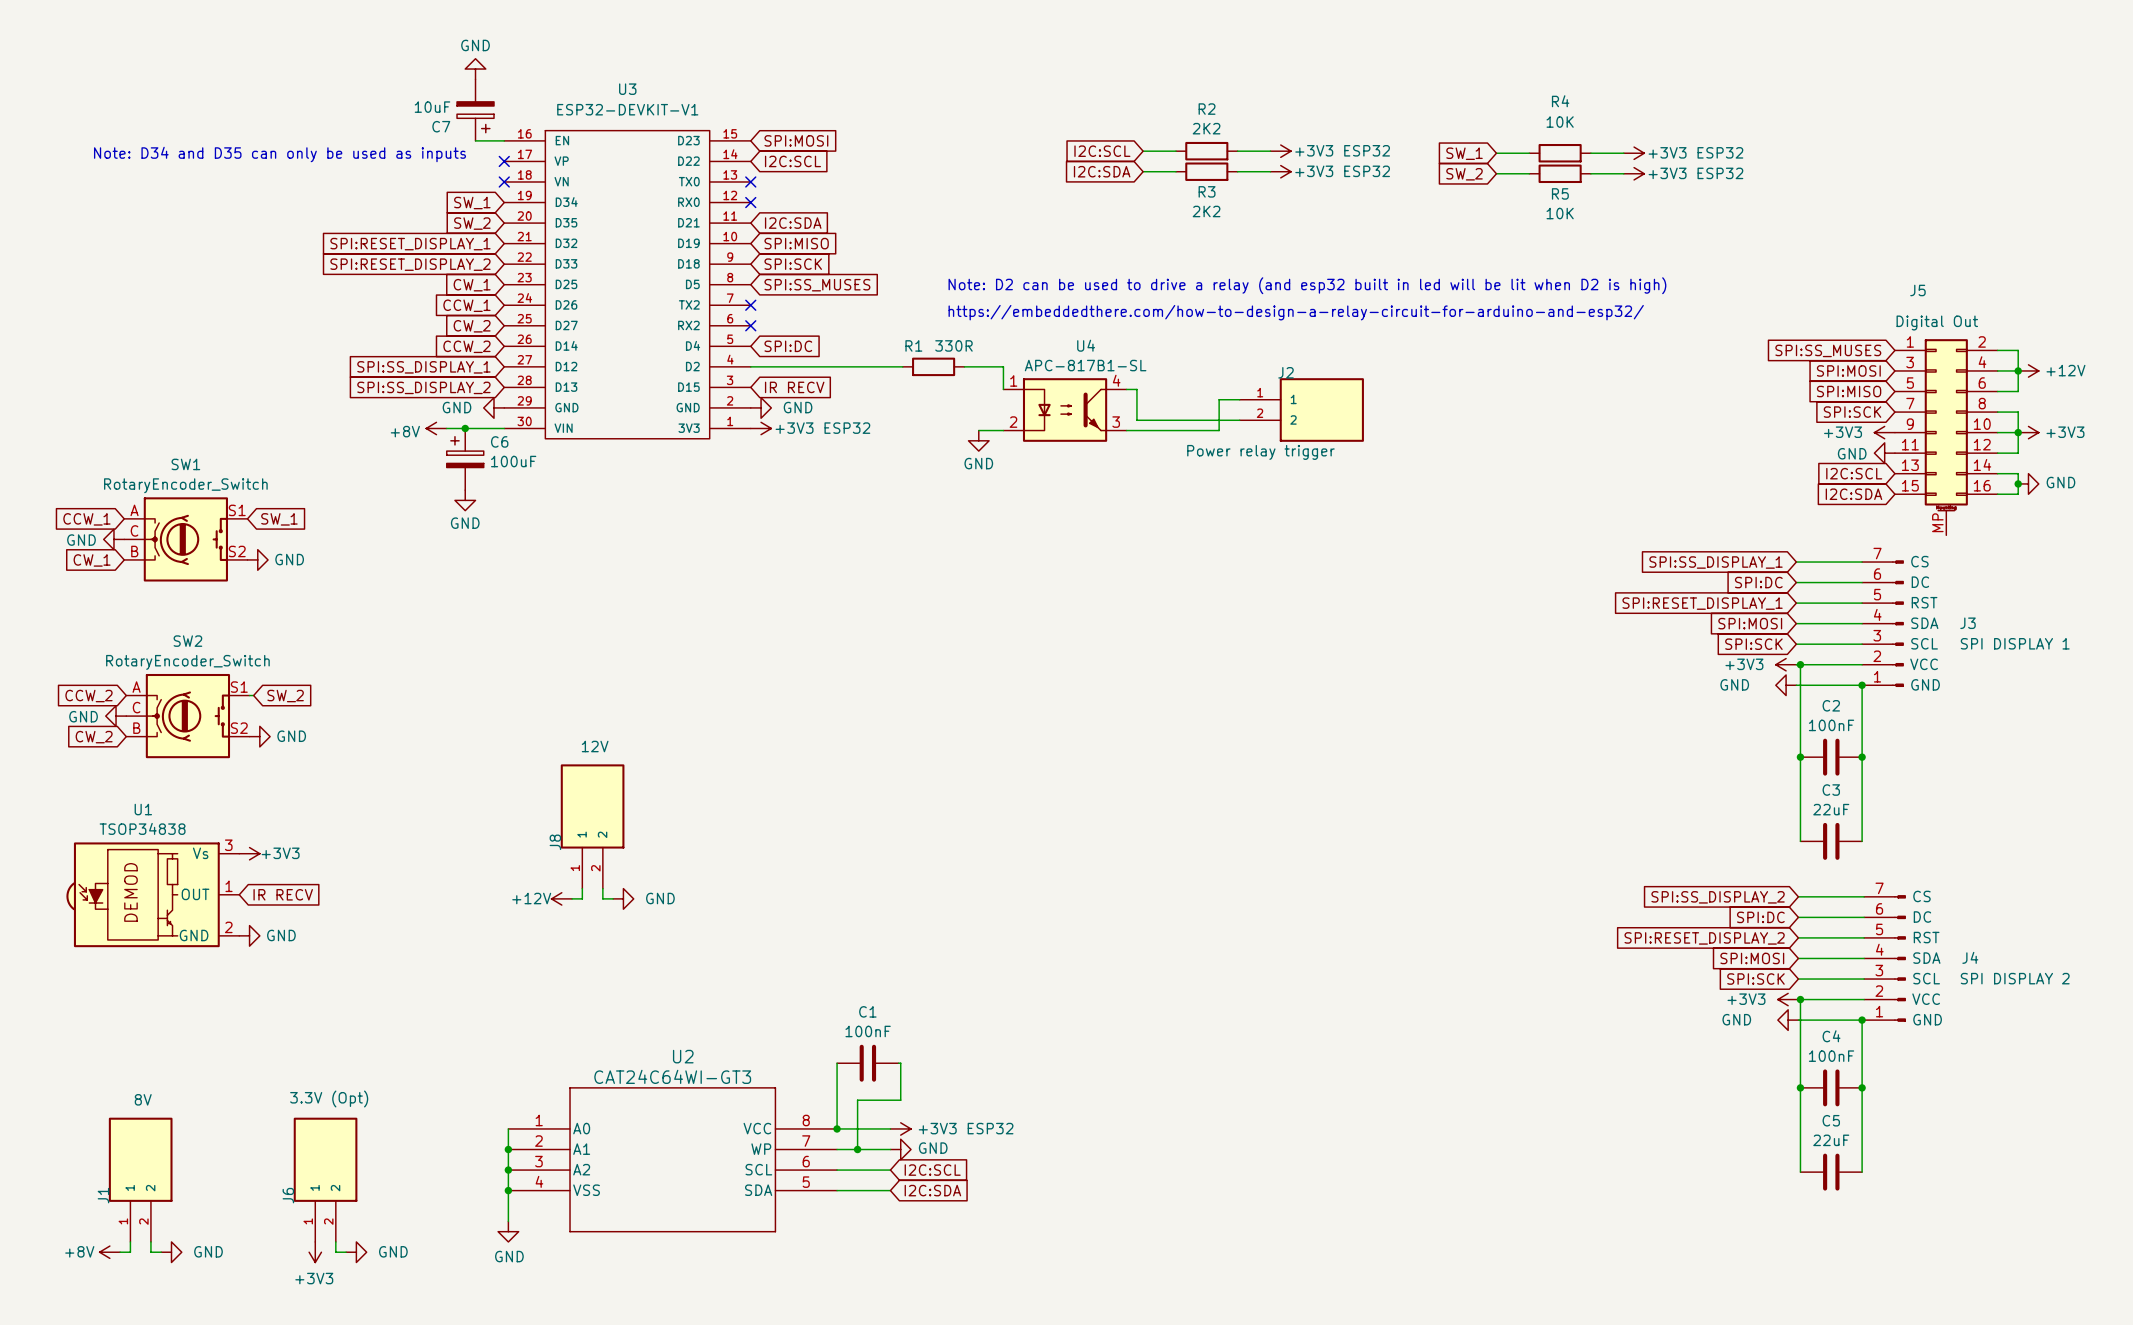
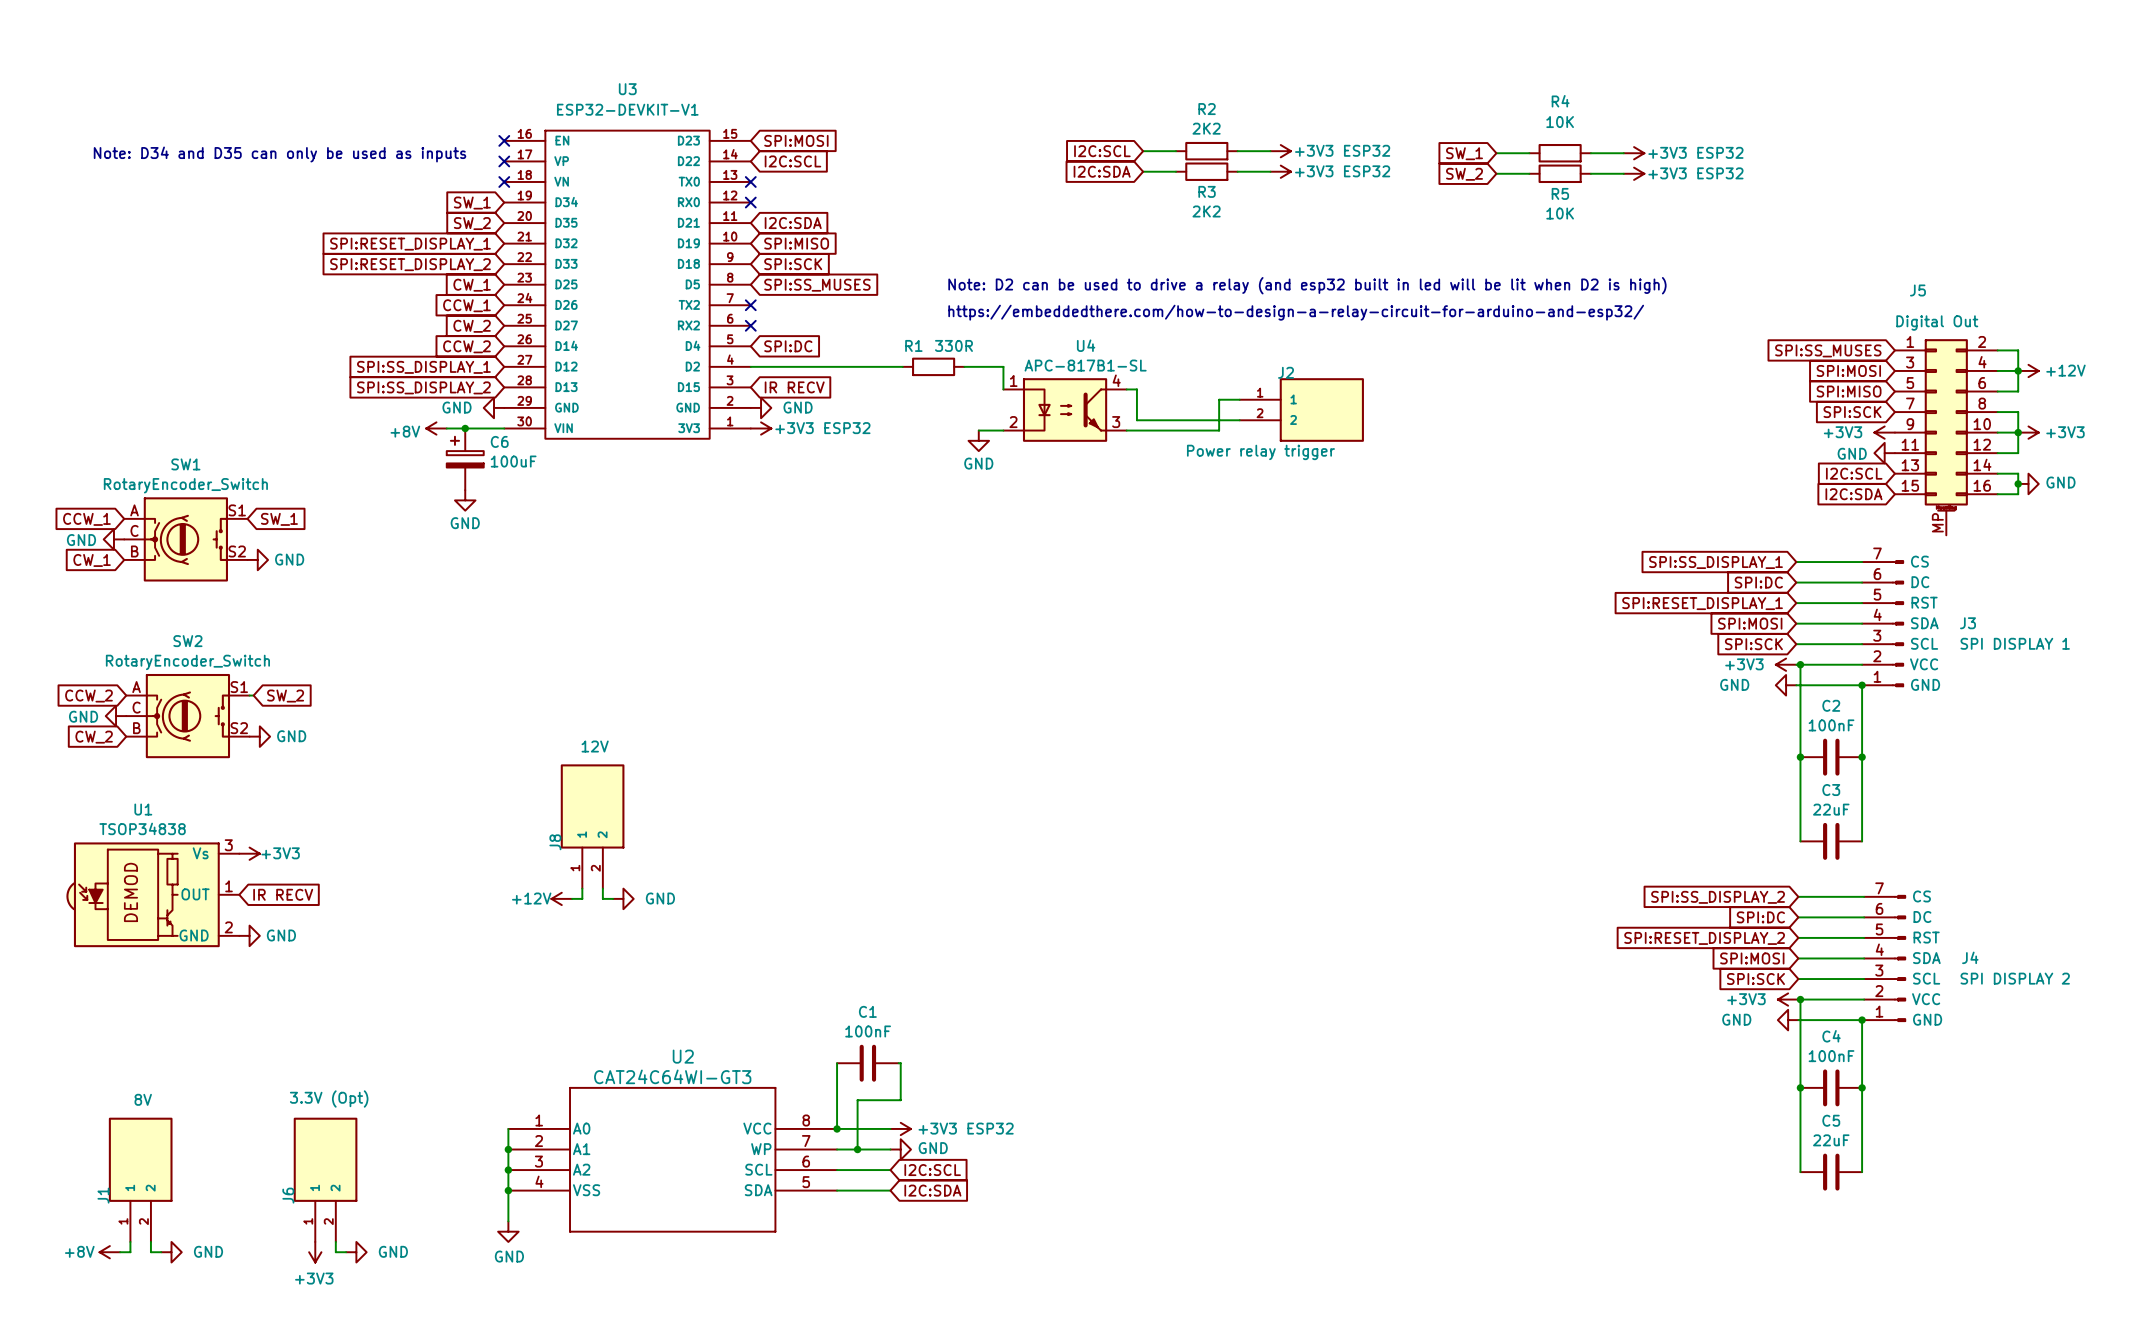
power symbol: GND (475, 69) -> none
C7: 10uF (475, 110) -> none
wire: (475, 140) (504, 140) -> none
no-connect mark: none -> (504, 140)

